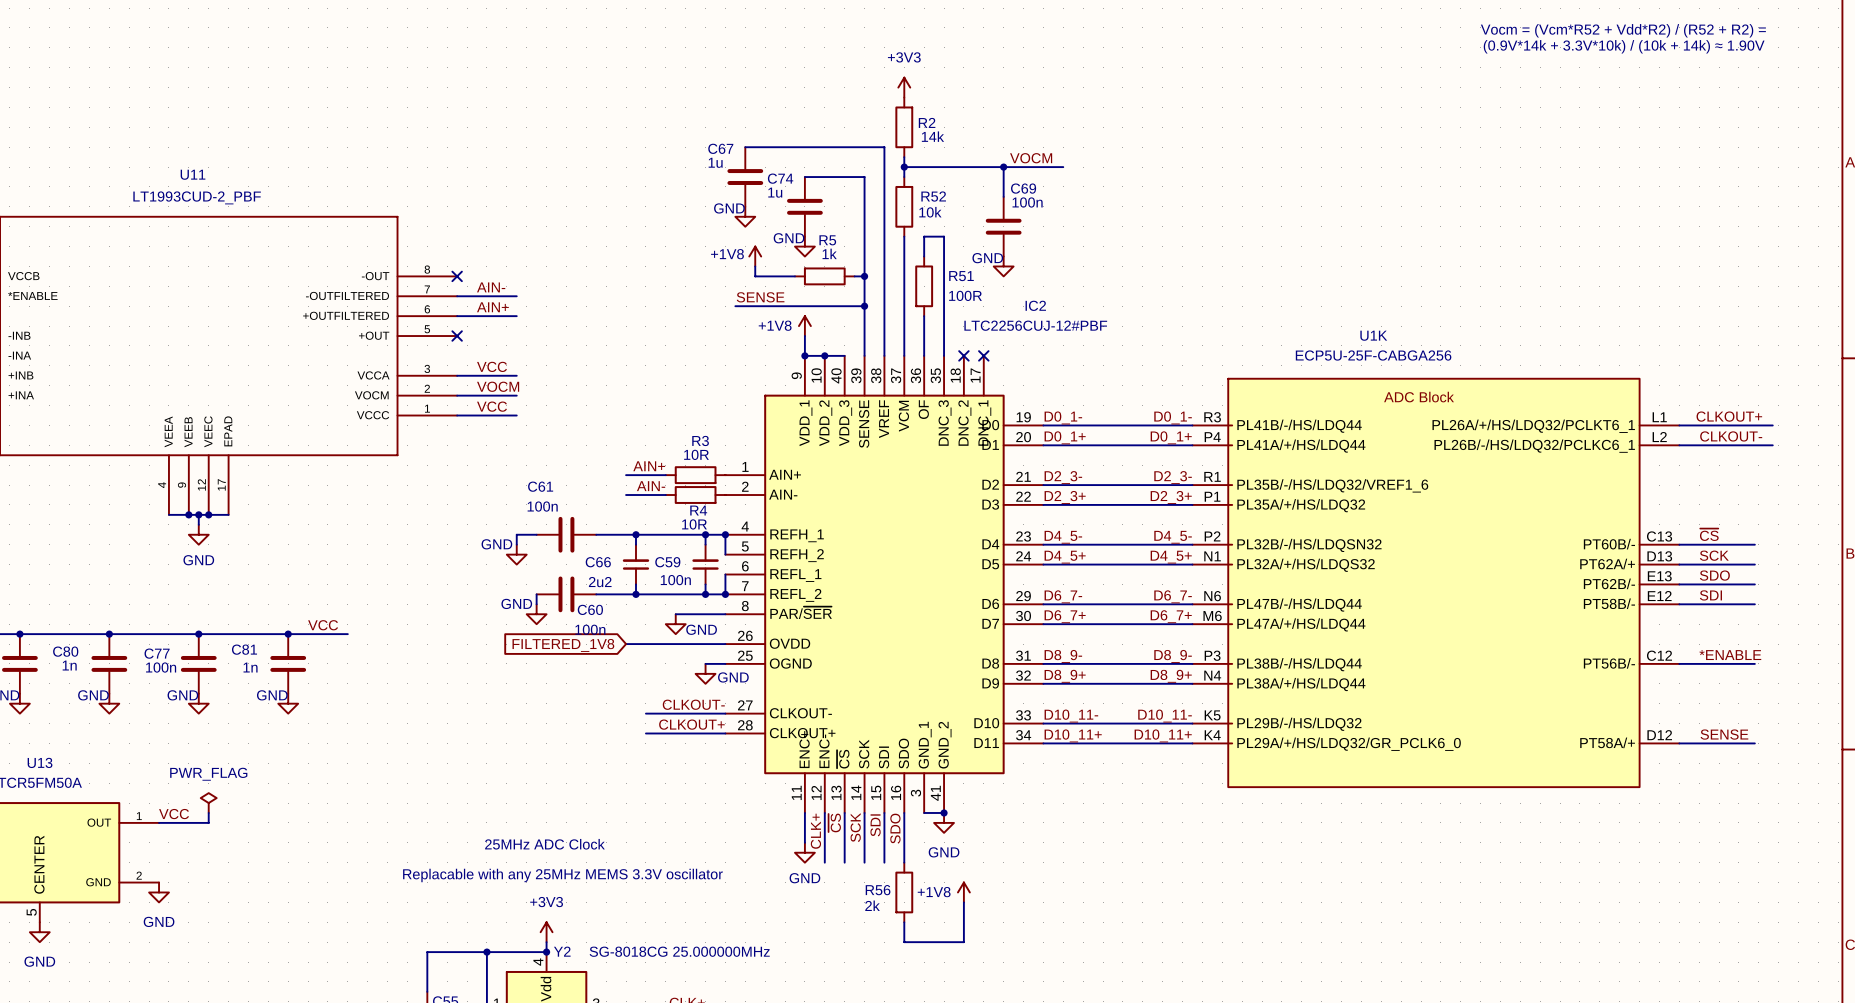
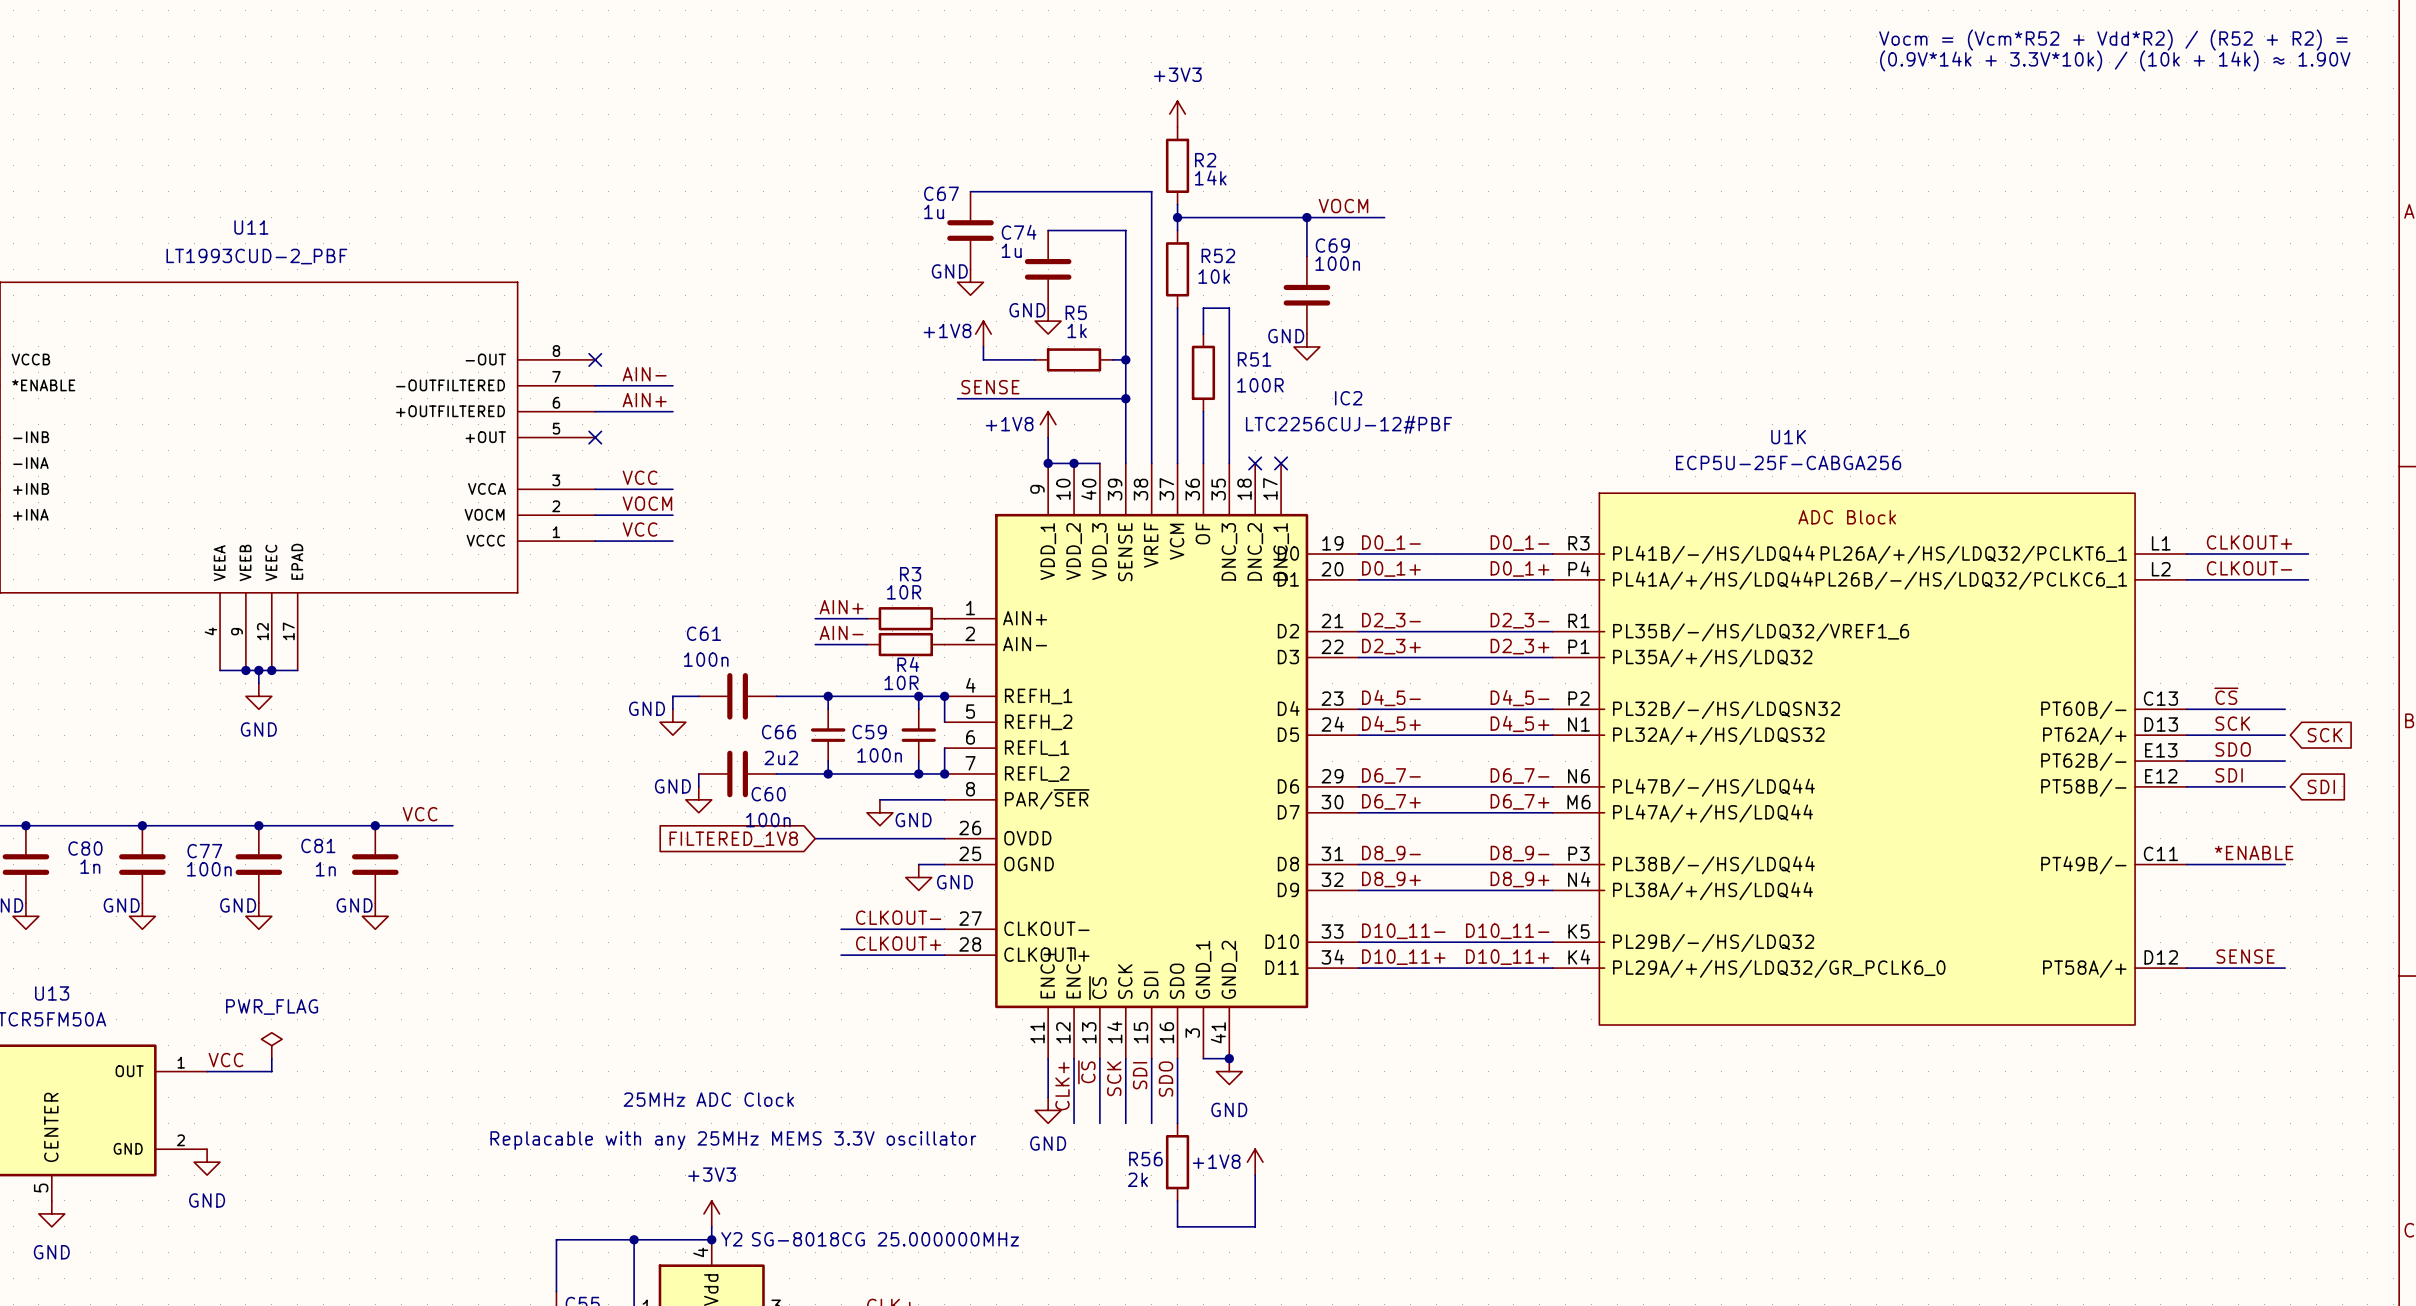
global label: none -> SCK (2325, 735)
global label: none -> SDI (2321, 786)
U1K pin number: C12 (1659, 655) -> C11 (2160, 853)
U1K pin name: PT56B/- (1609, 663) -> PT49B/- (2083, 865)

